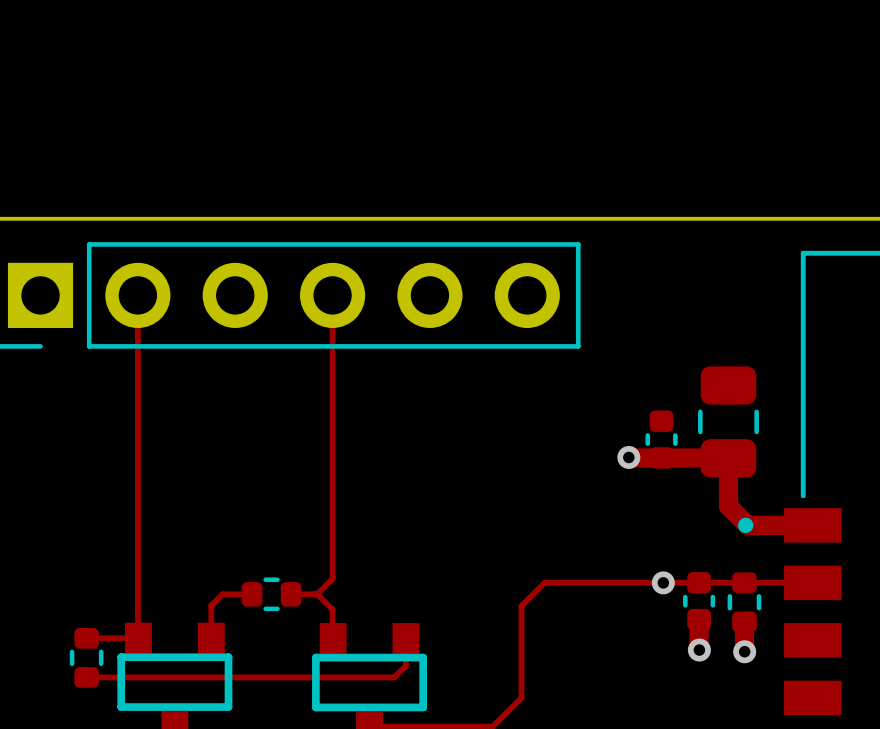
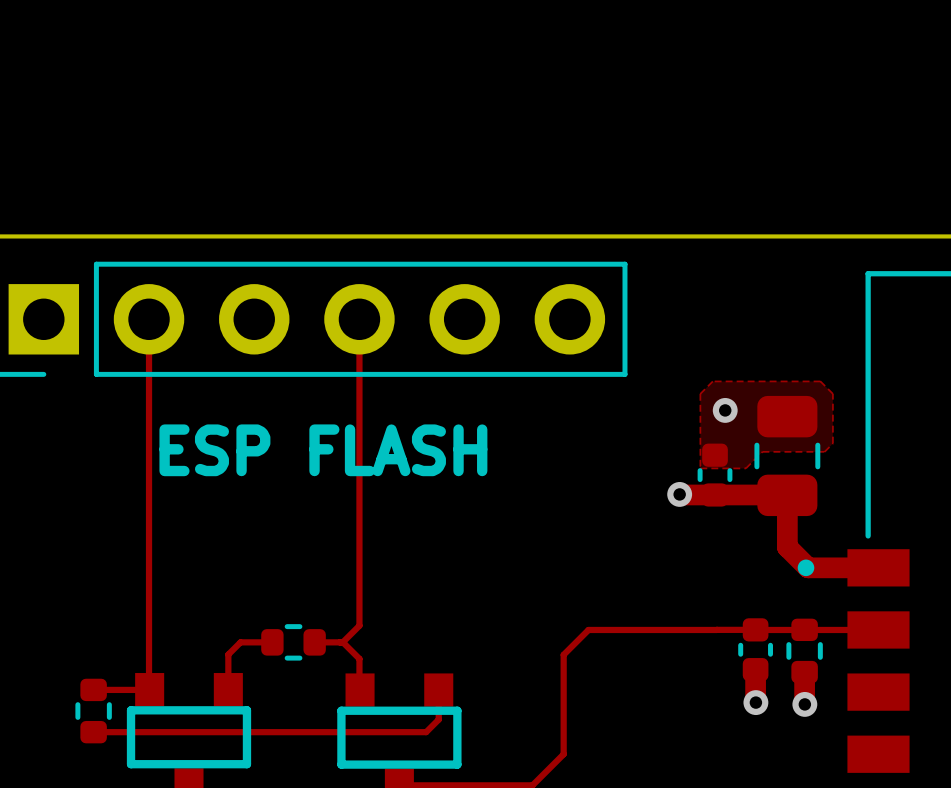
zone outline: none -> (712, 381) (820, 381) (832, 393) (832, 443) (824, 451) (762, 451) (745, 468) (700, 468) (700, 393) (712, 381)
text: none -> ESP FLASH (323, 450)
via position: (663, 582) -> (725, 410)

